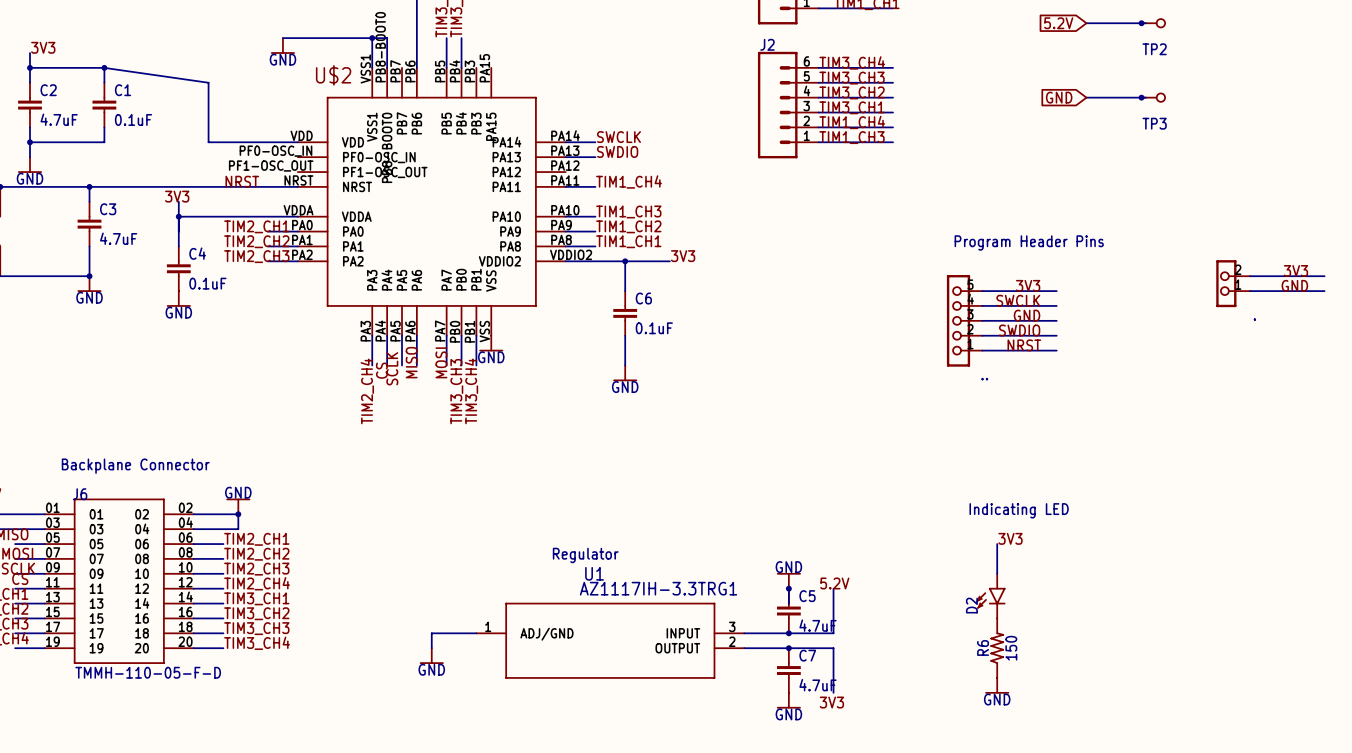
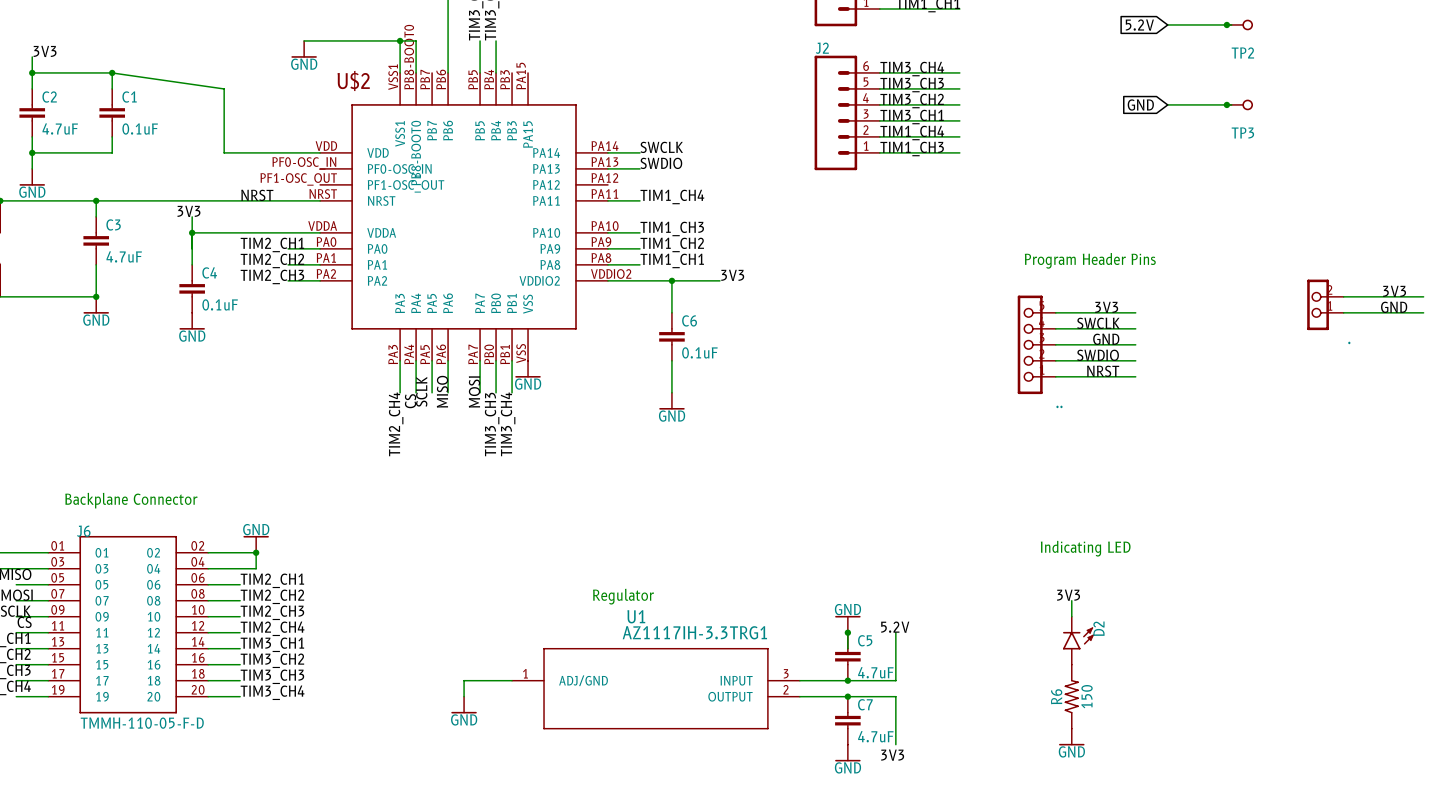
label position: 3V3 (1010, 538) -> 3V3 (1068, 595)
wire: (997, 544) (997, 558) -> none
D2 rotation: 0° (991, 598) -> 180° (1078, 638)

